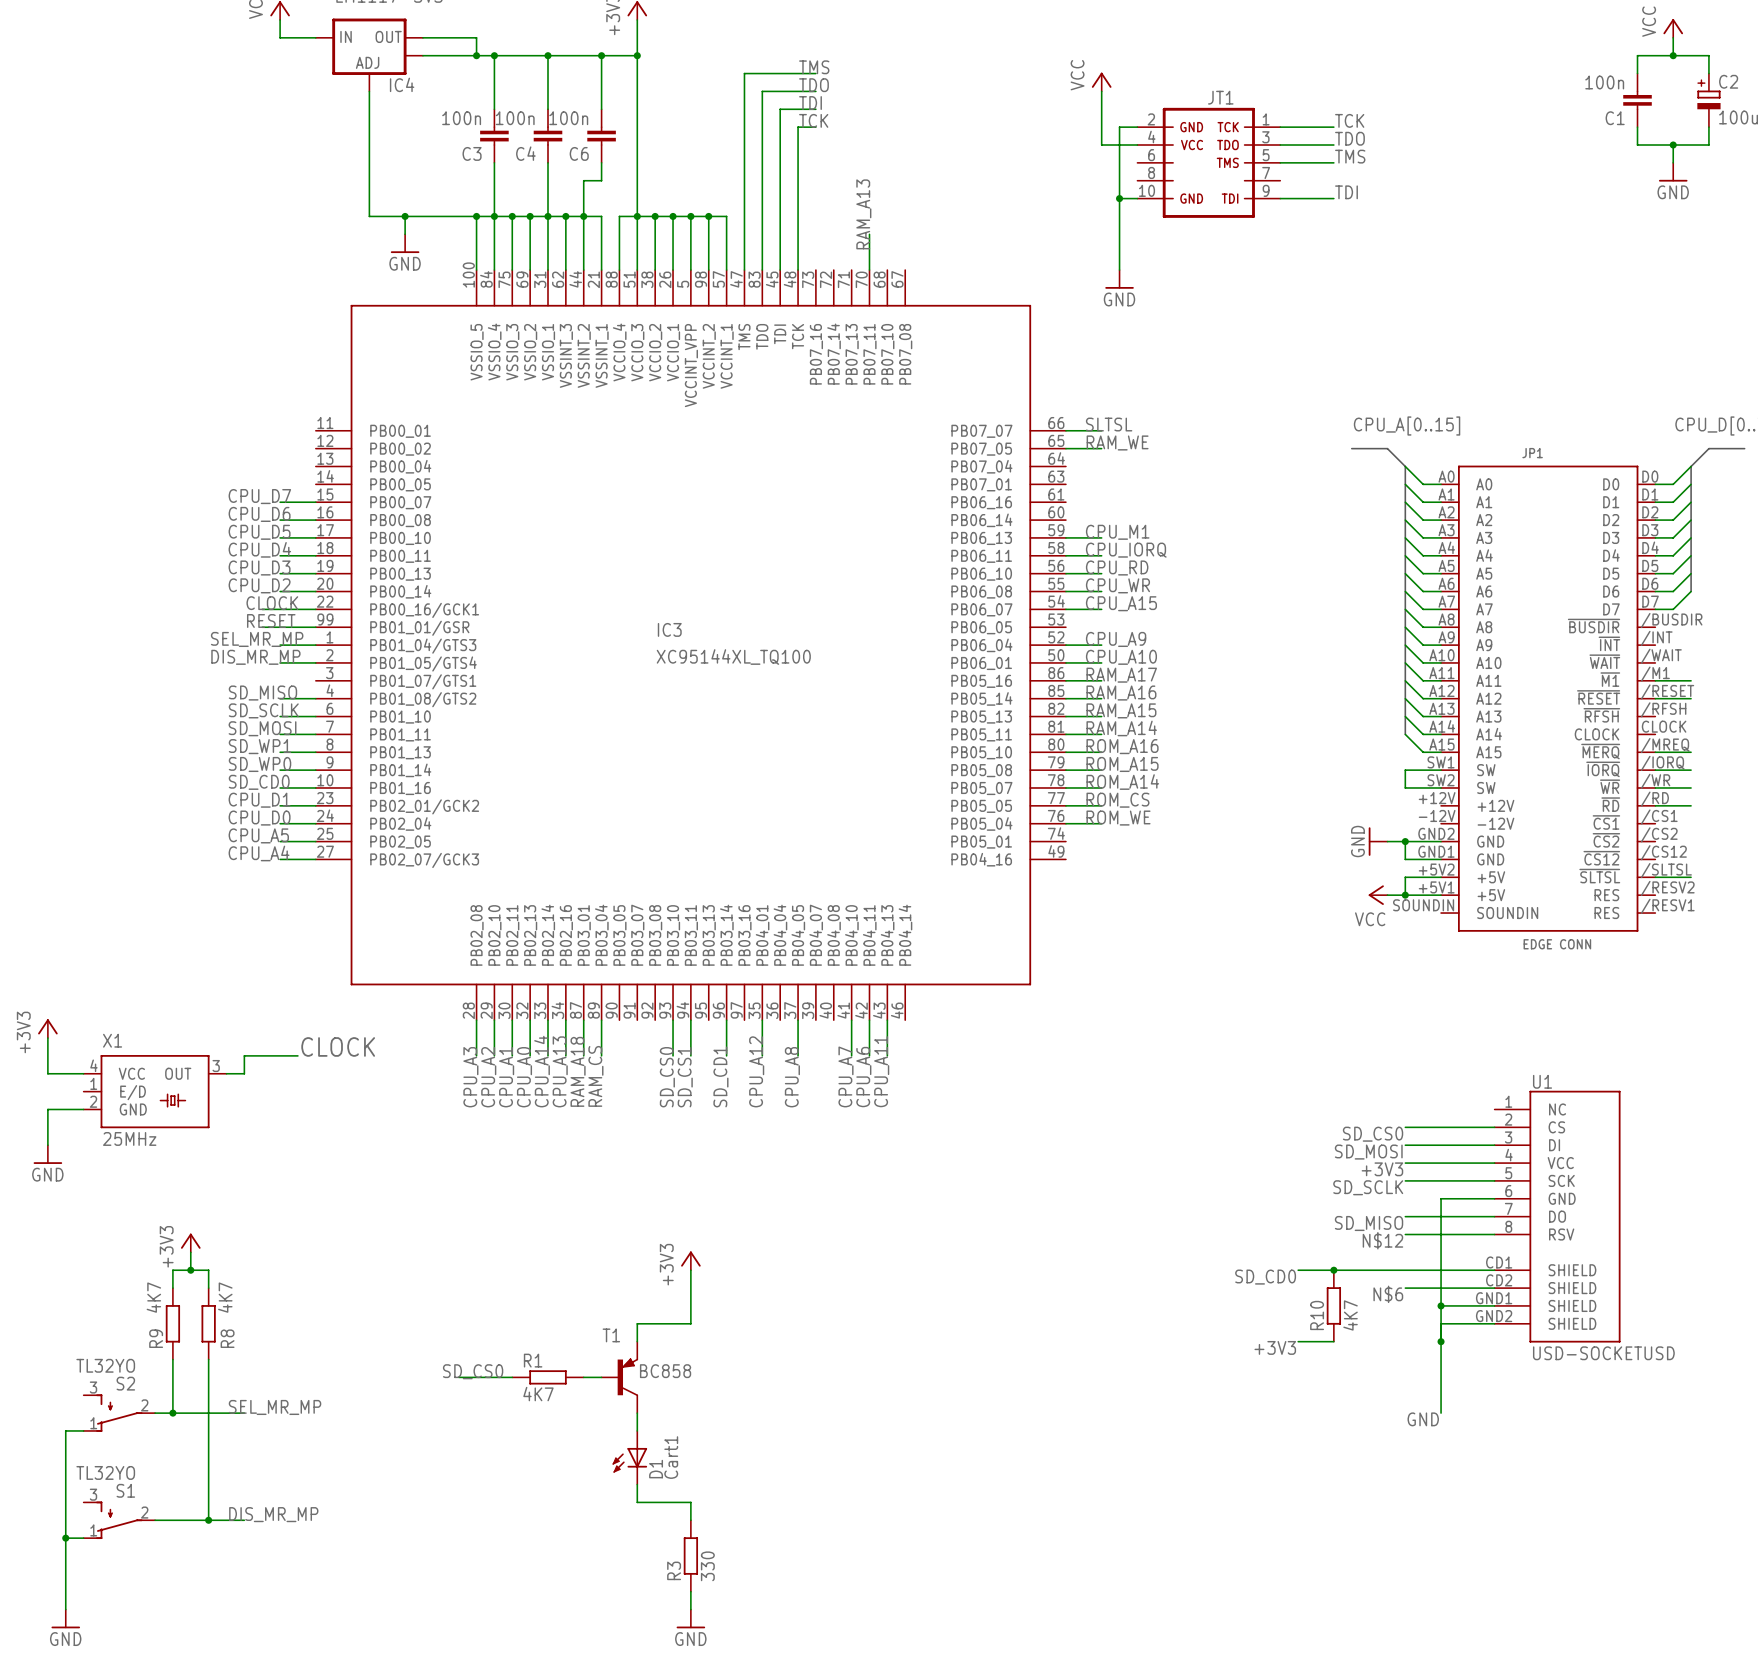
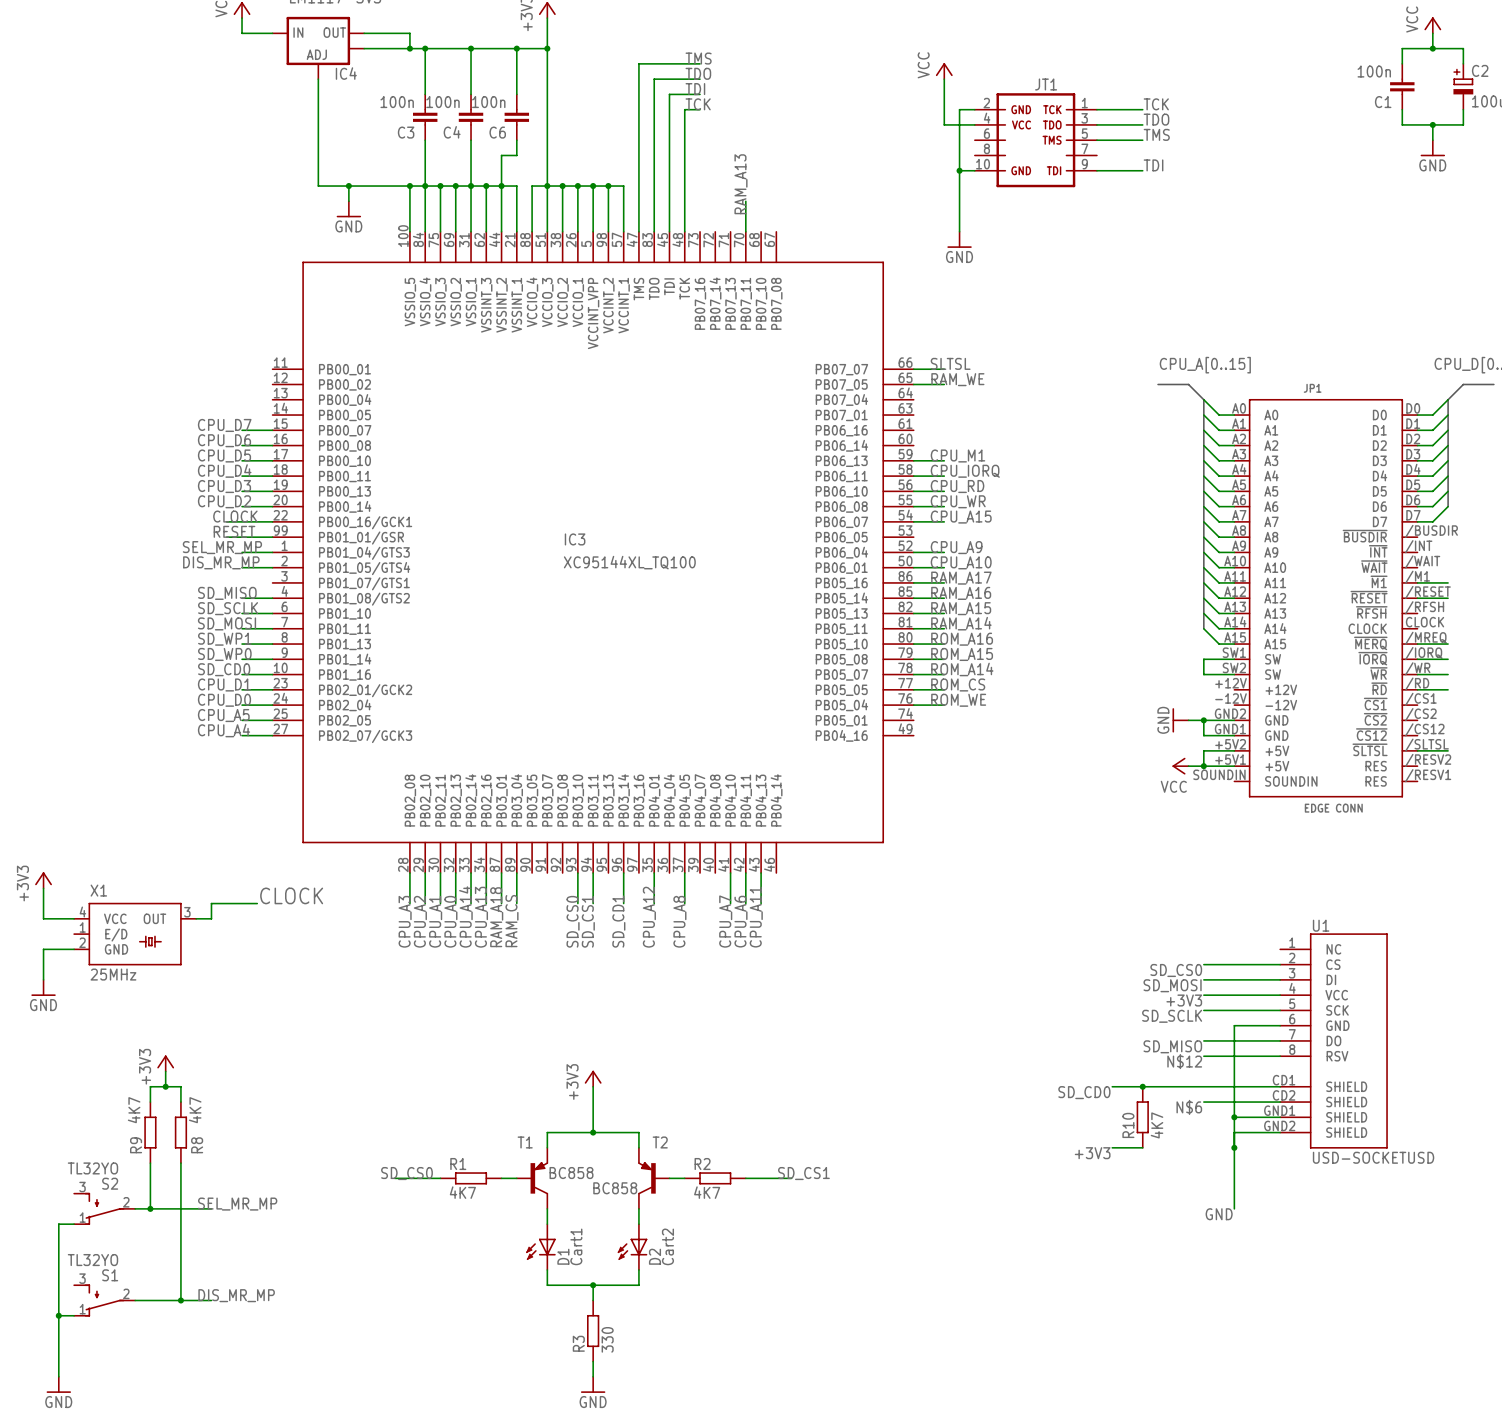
wire: none -> (593, 1132) (638, 1132) (638, 1147)
junction: none -> (593, 1132)
label: none -> SD_CS1 (803, 1173)
T2: none -> BC858 (653, 1178)
wire: none -> (669, 1178) (684, 1178)
R2: none -> 4K7 (715, 1178)
wire: none -> (745, 1178) (791, 1178)
wire: none -> (638, 1208) (638, 1224)
D2: none -> Cart2 (632, 1247)
wire: none -> (638, 1269) (638, 1285) (593, 1285)
junction: none -> (593, 1285)

